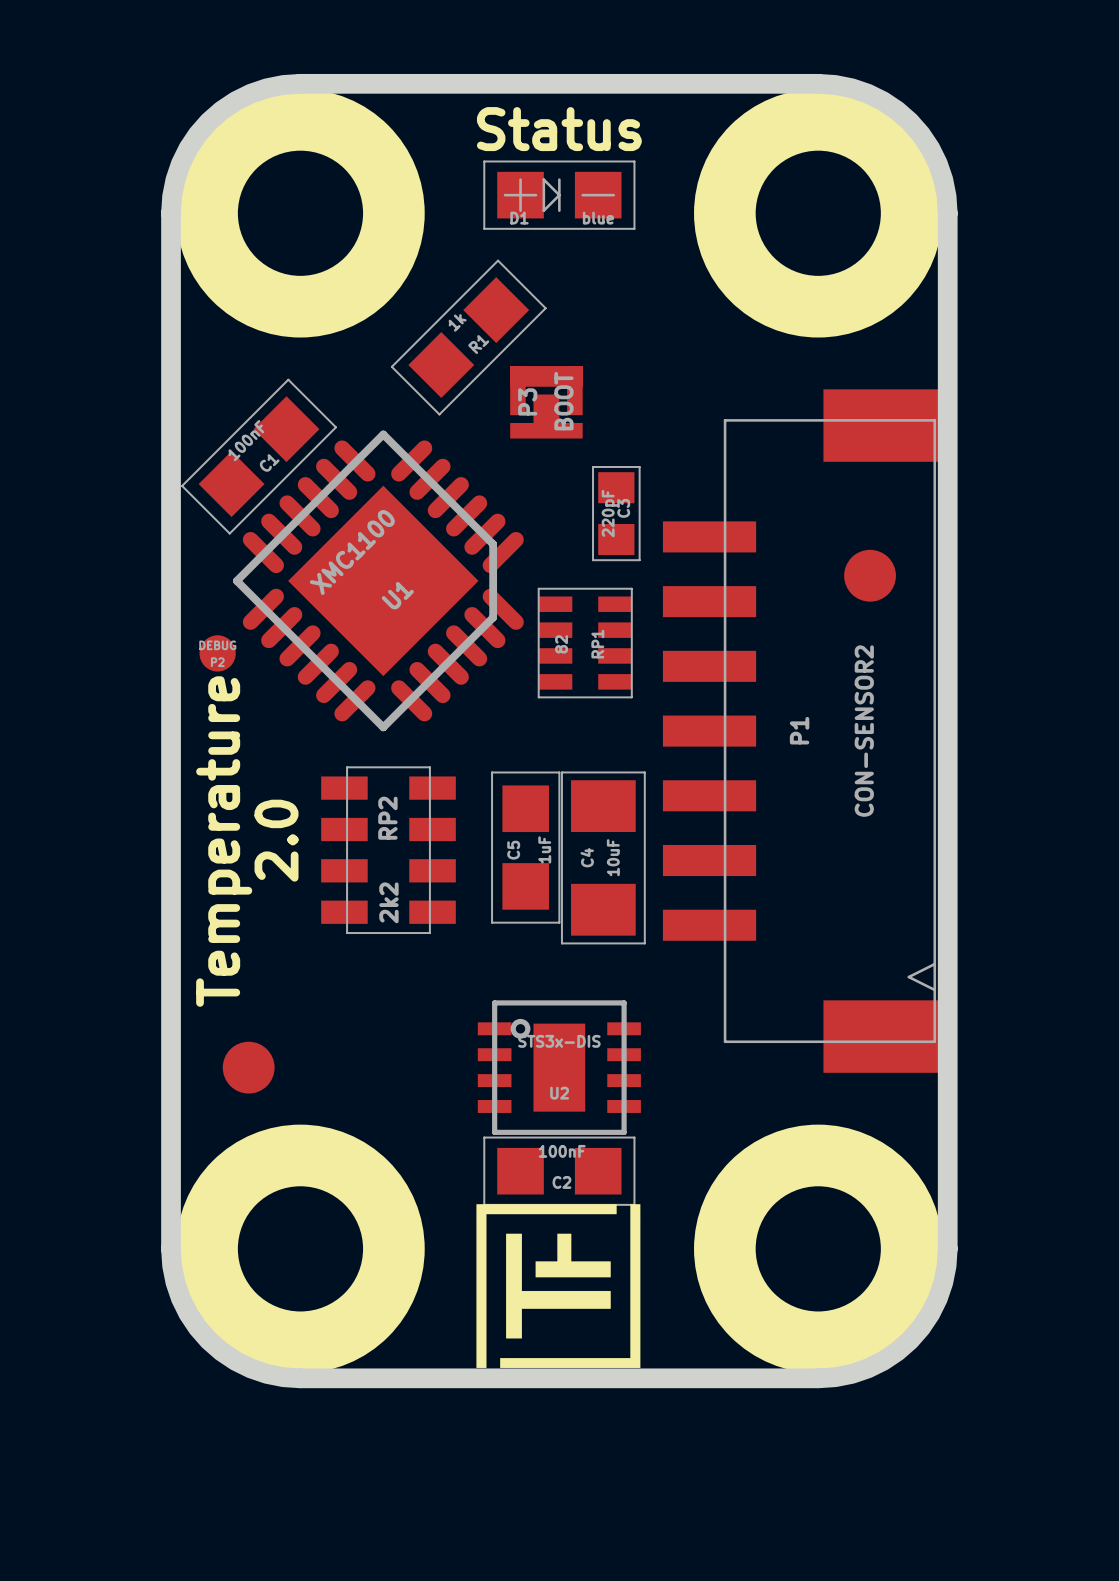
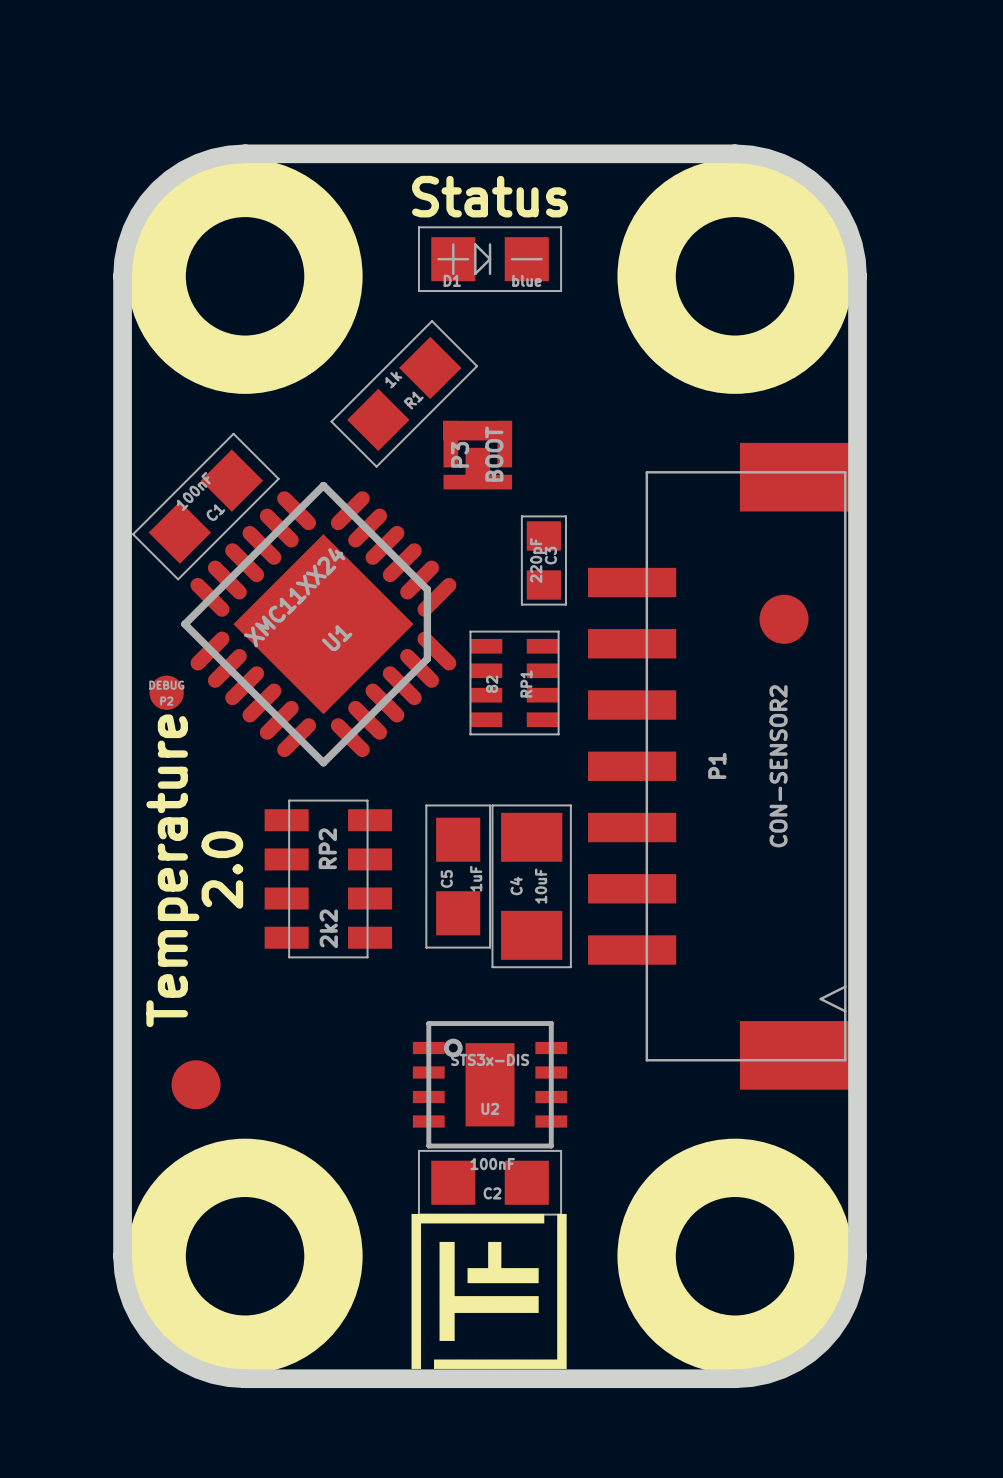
U1 value: XMC1100 (352, 552) -> XMC11XX24 (294, 597)

